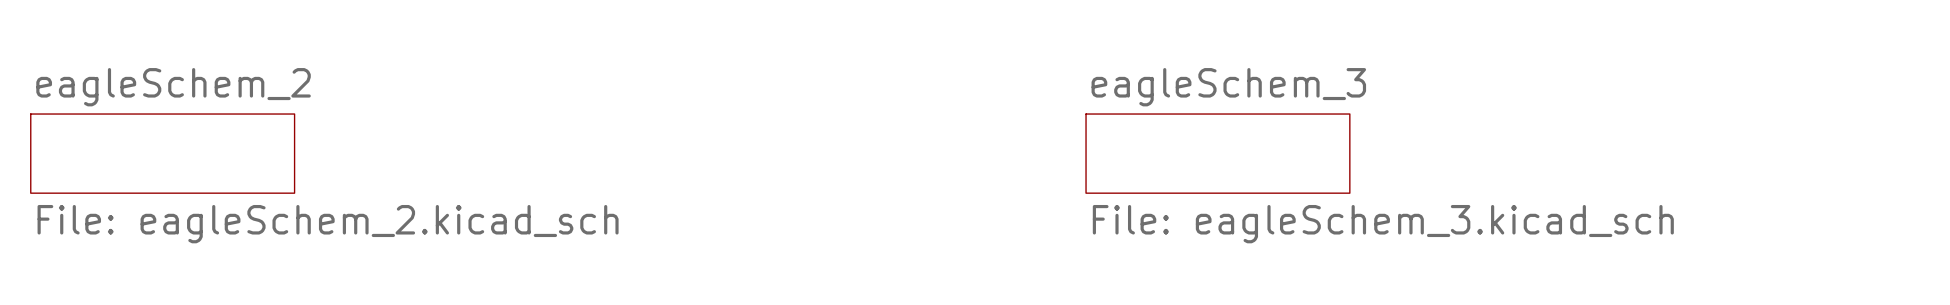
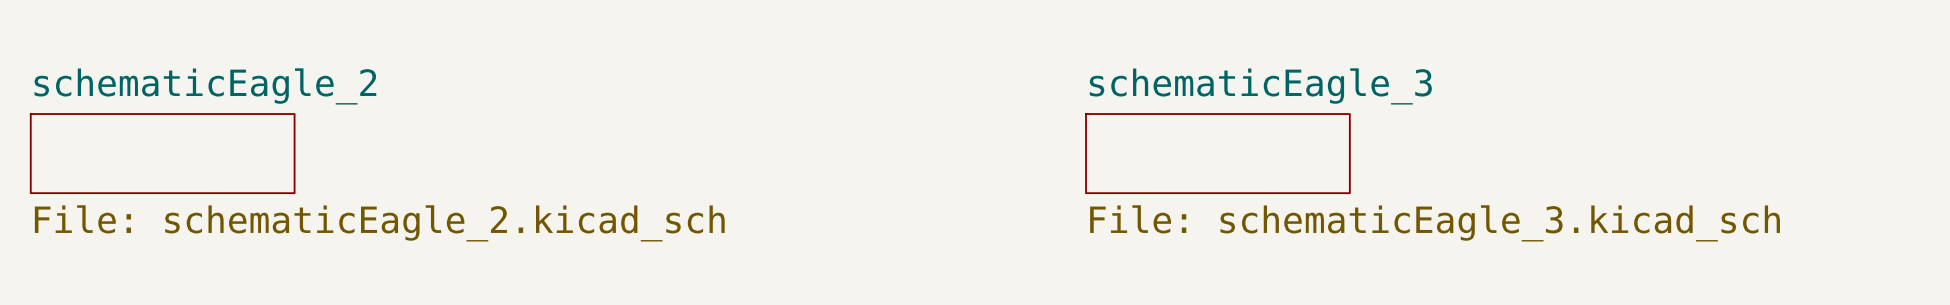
sheet eagleSchem_2 name: eagleSchem_2 (173, 87) -> schematicEagle_2 (205, 86)
sheet eagleSchem_3 name: eagleSchem_3 (1228, 87) -> schematicEagle_3 (1260, 86)
sheet eagleSchem_2 value: File: eagleSchem_2.kicad_sch (328, 224) -> File: schematicEagle_2.kicad_sch (379, 223)
sheet eagleSchem_3 value: File: eagleSchem_3.kicad_sch (1383, 224) -> File: schematicEagle_3.kicad_sch (1435, 223)

